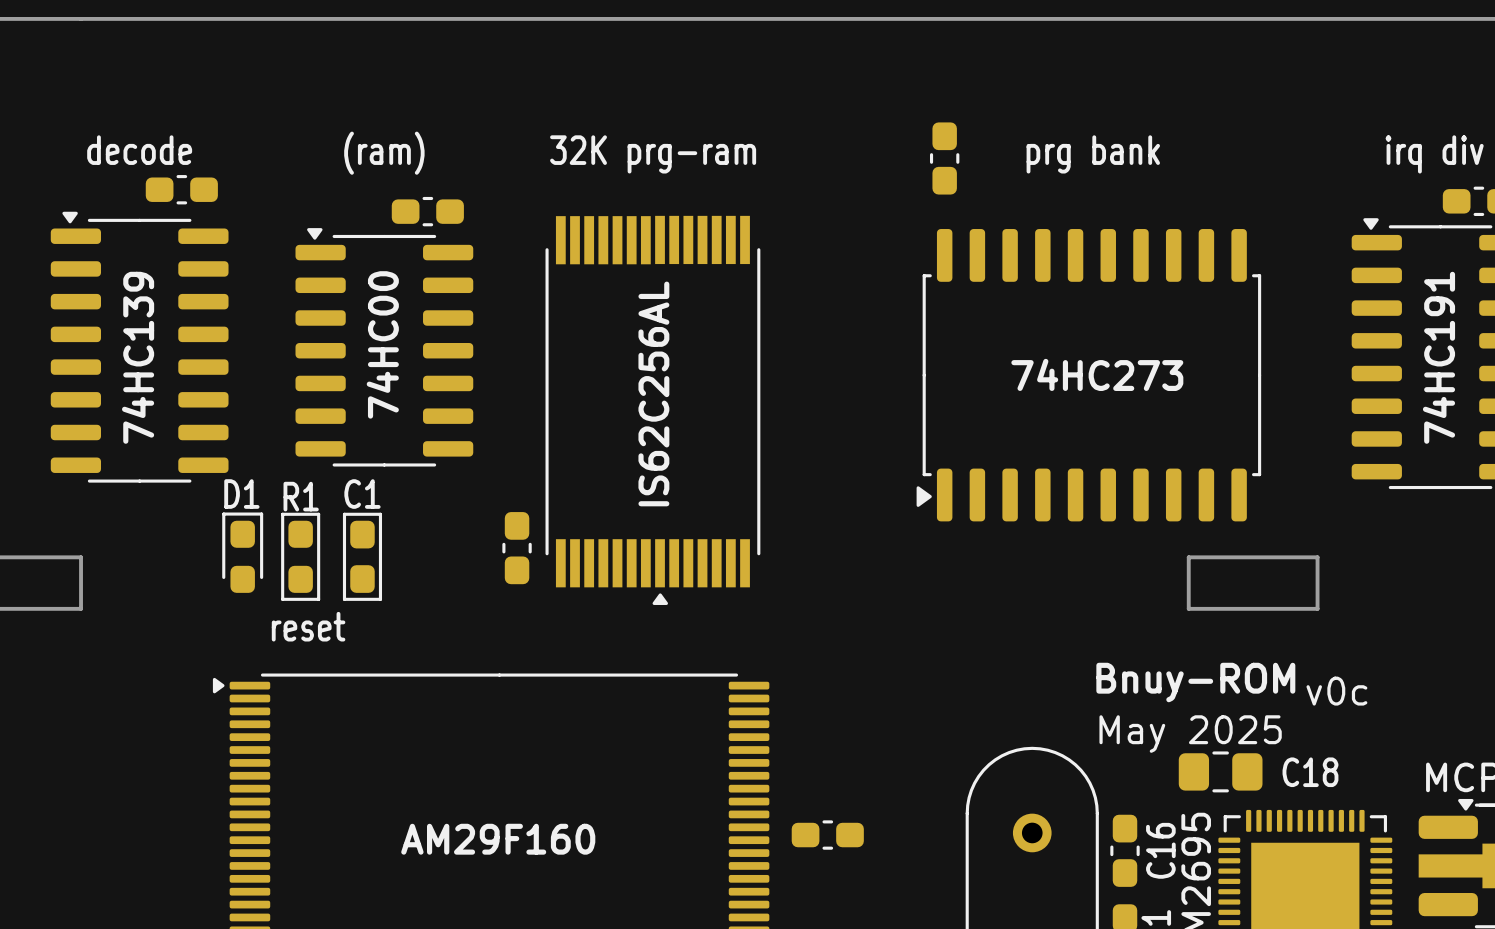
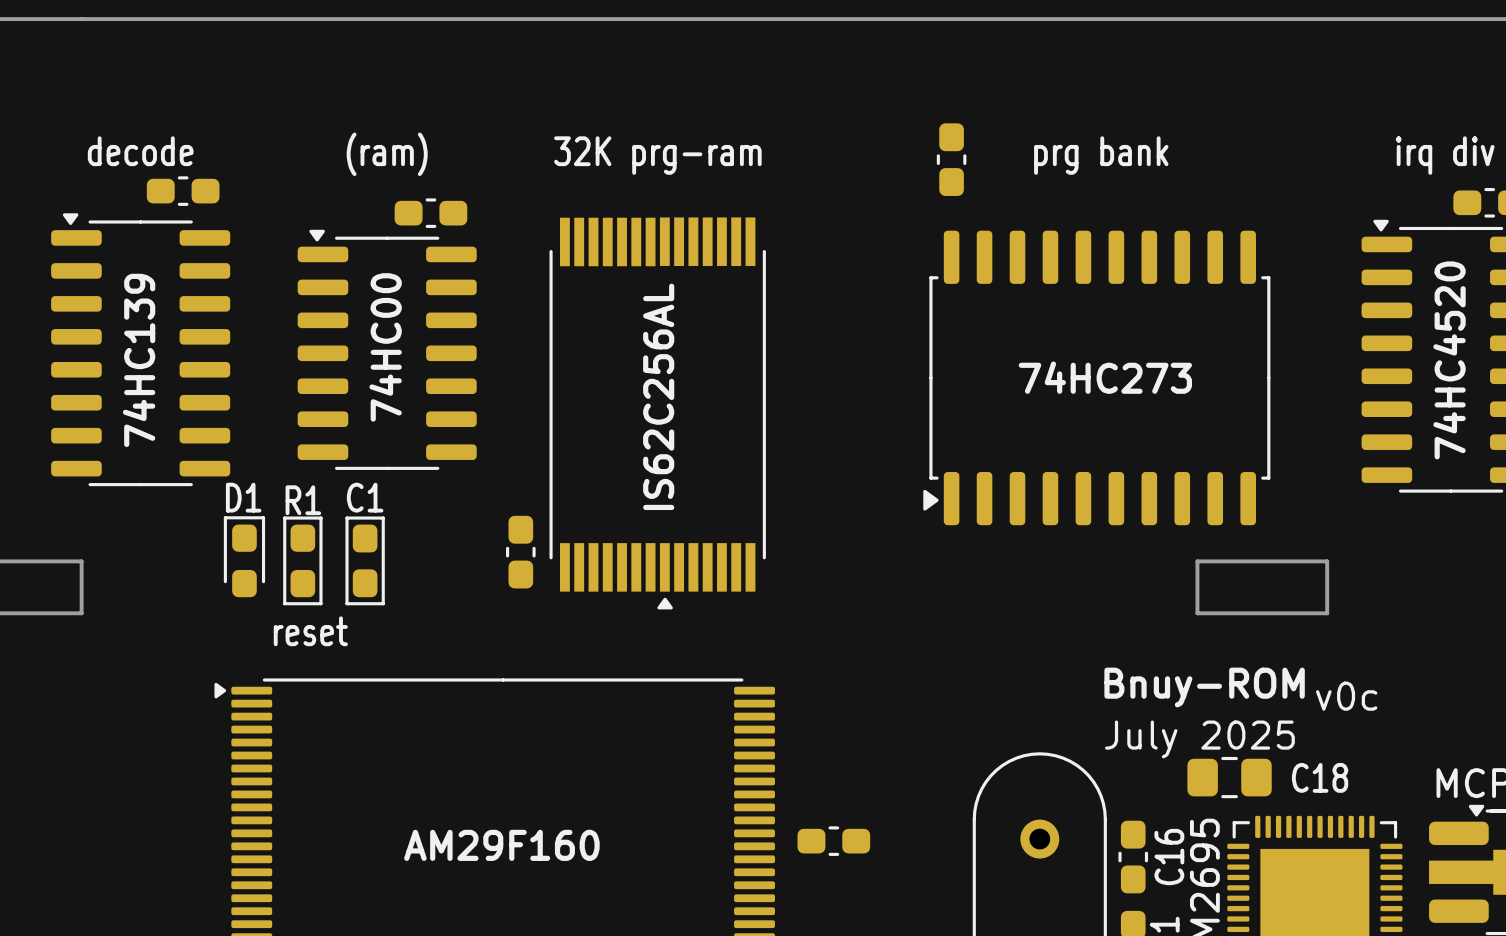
part value: 74HC191 (1438, 357) -> 74HC4520 (1449, 360)
text: May 2025 (1190, 734) -> July 2025 (1199, 739)

